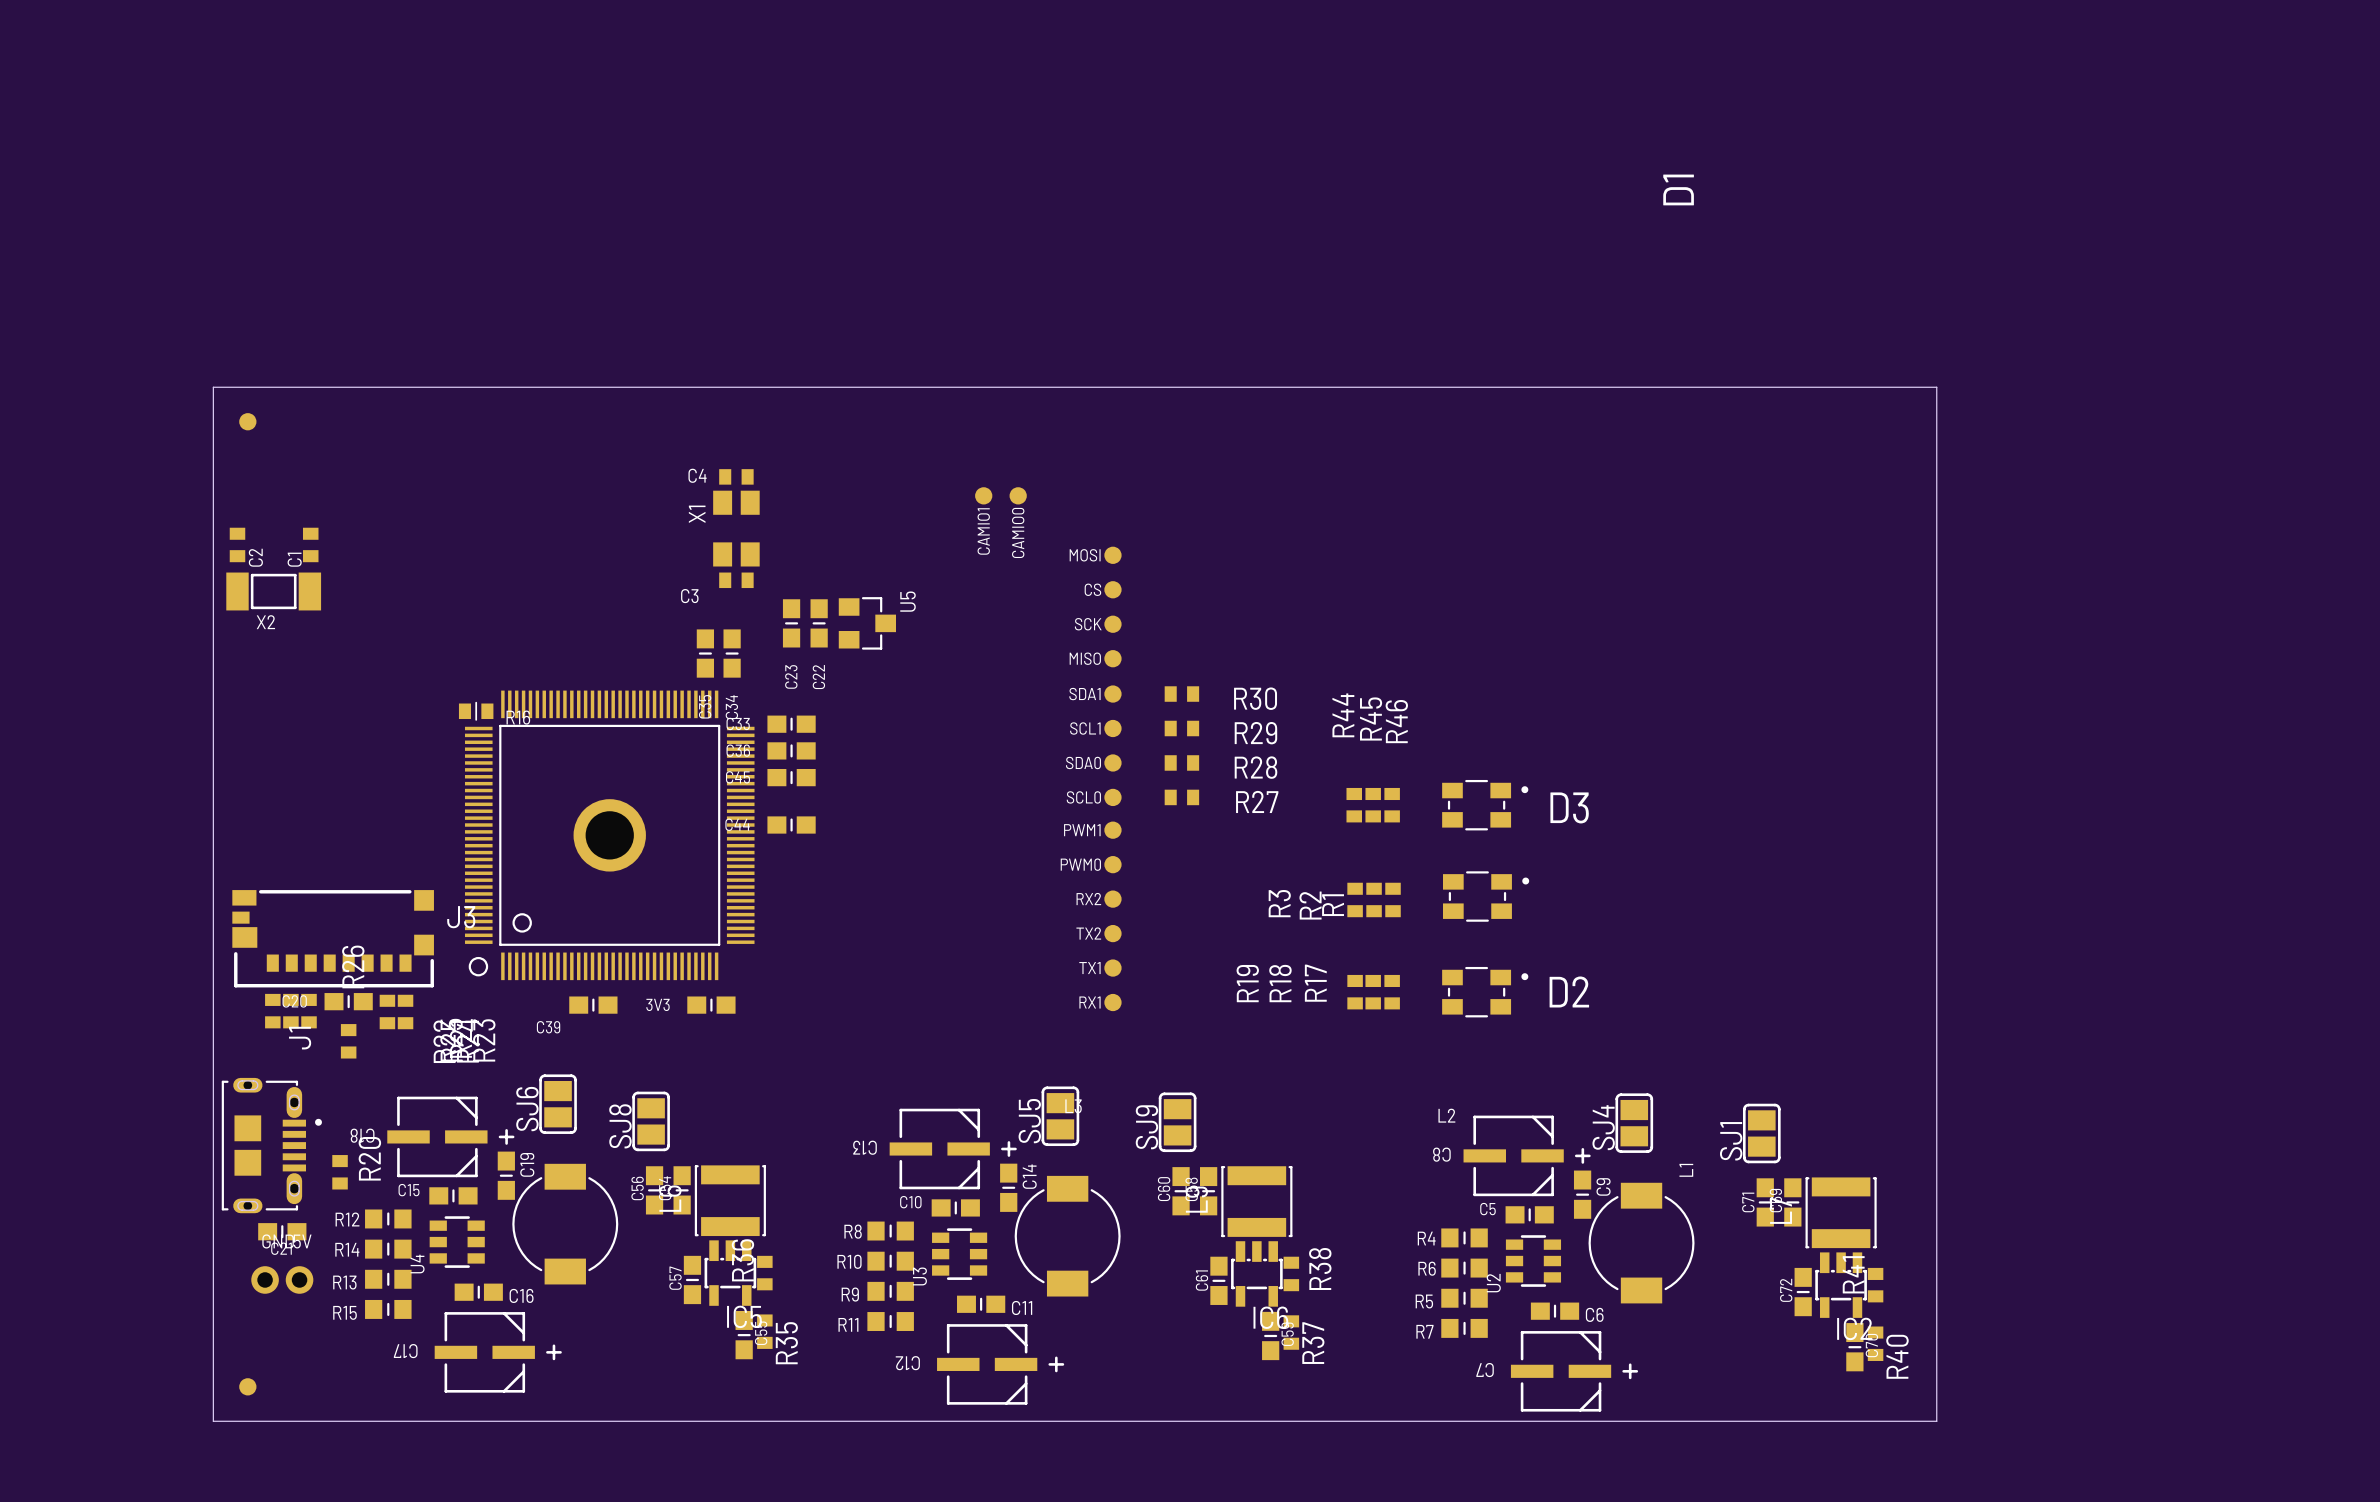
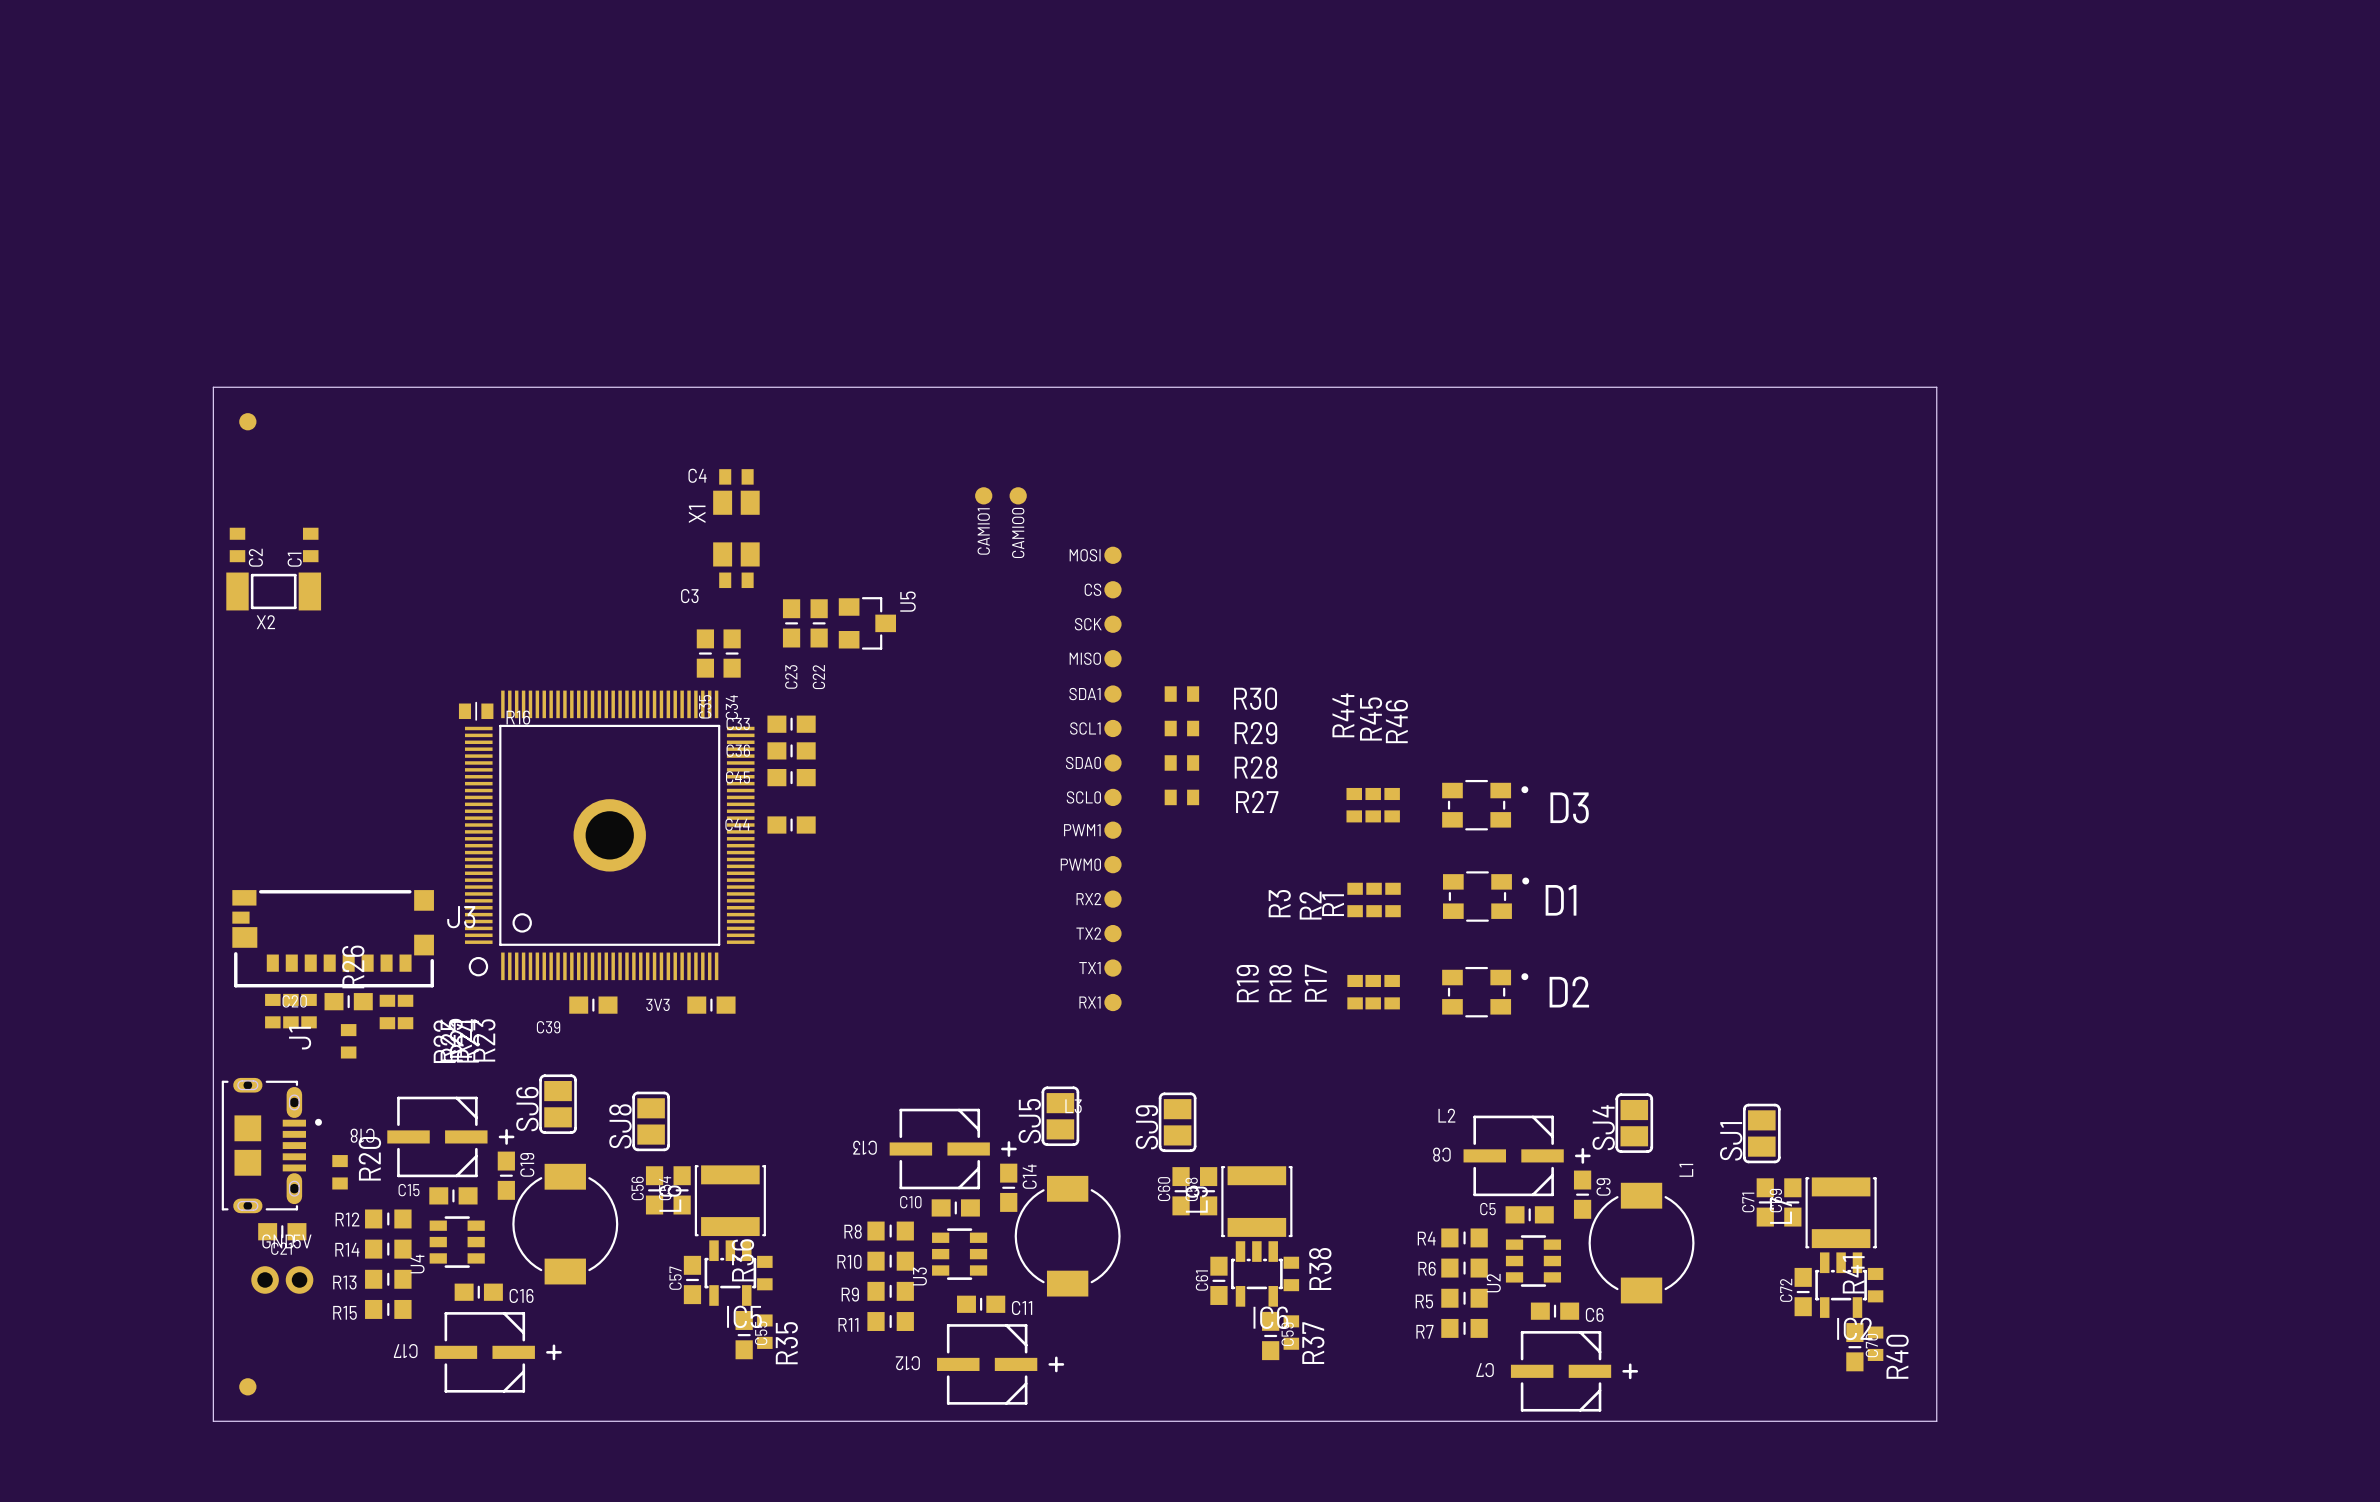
D1 name rotation: 0° (1678, 189) -> 90° clockwise (1561, 900)
D1 name position: D1 (1678, 189) -> D1 (1561, 900)

